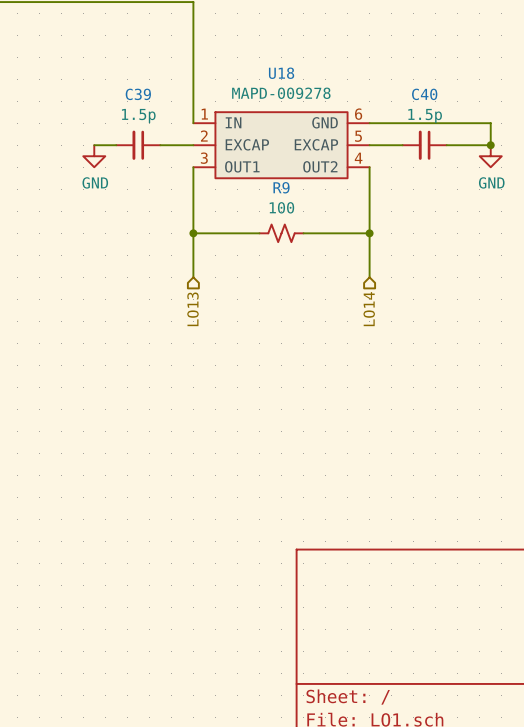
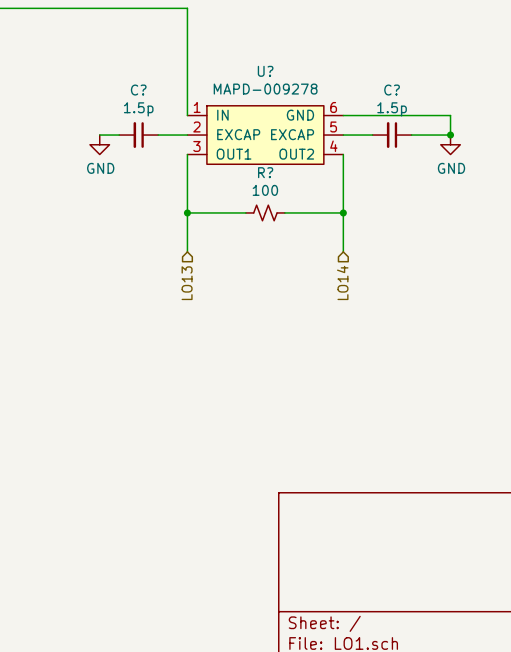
U18 name: U18 (281, 73) -> U? (265, 71)
C39 name: C39 (138, 94) -> C? (138, 90)
C40 name: C40 (424, 94) -> C? (392, 90)
R9 name: R9 (281, 187) -> R? (265, 172)

